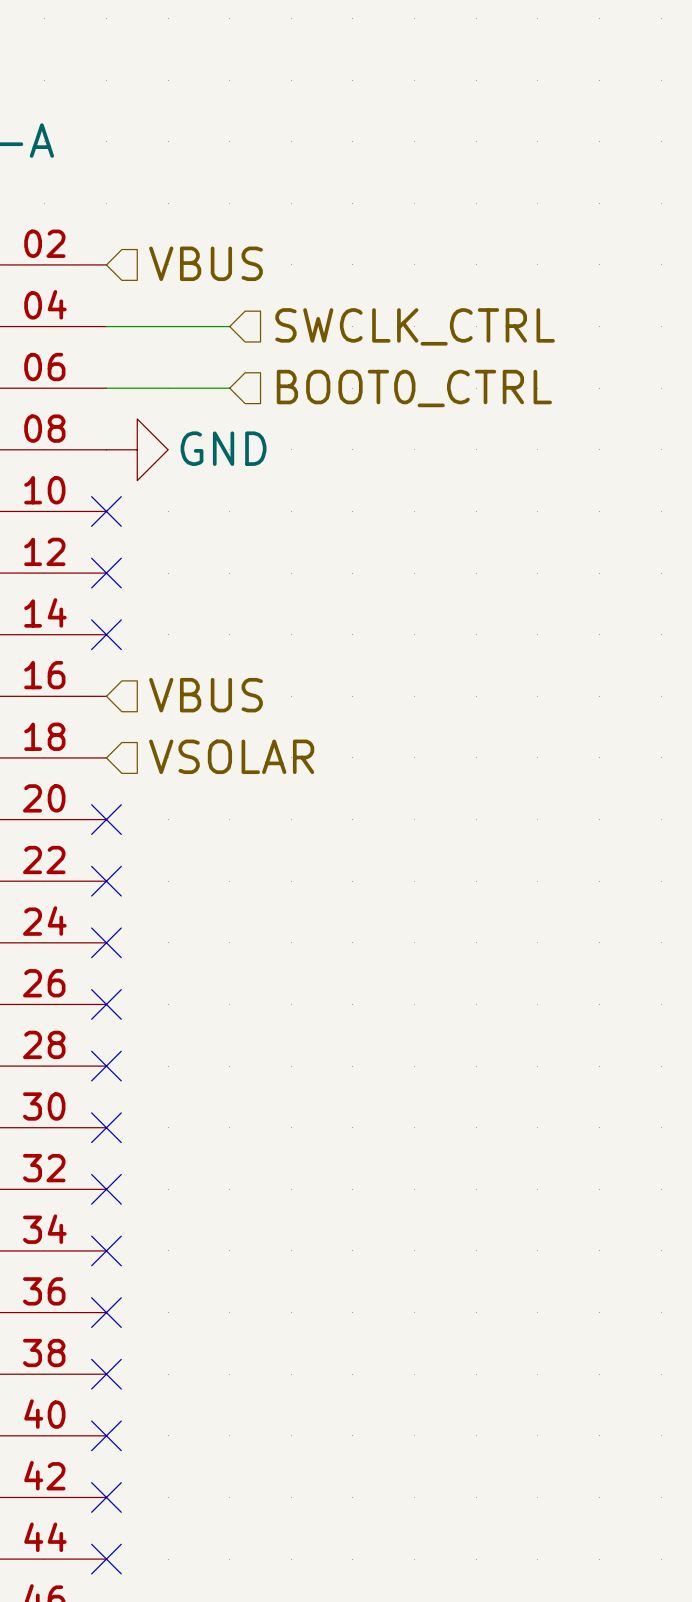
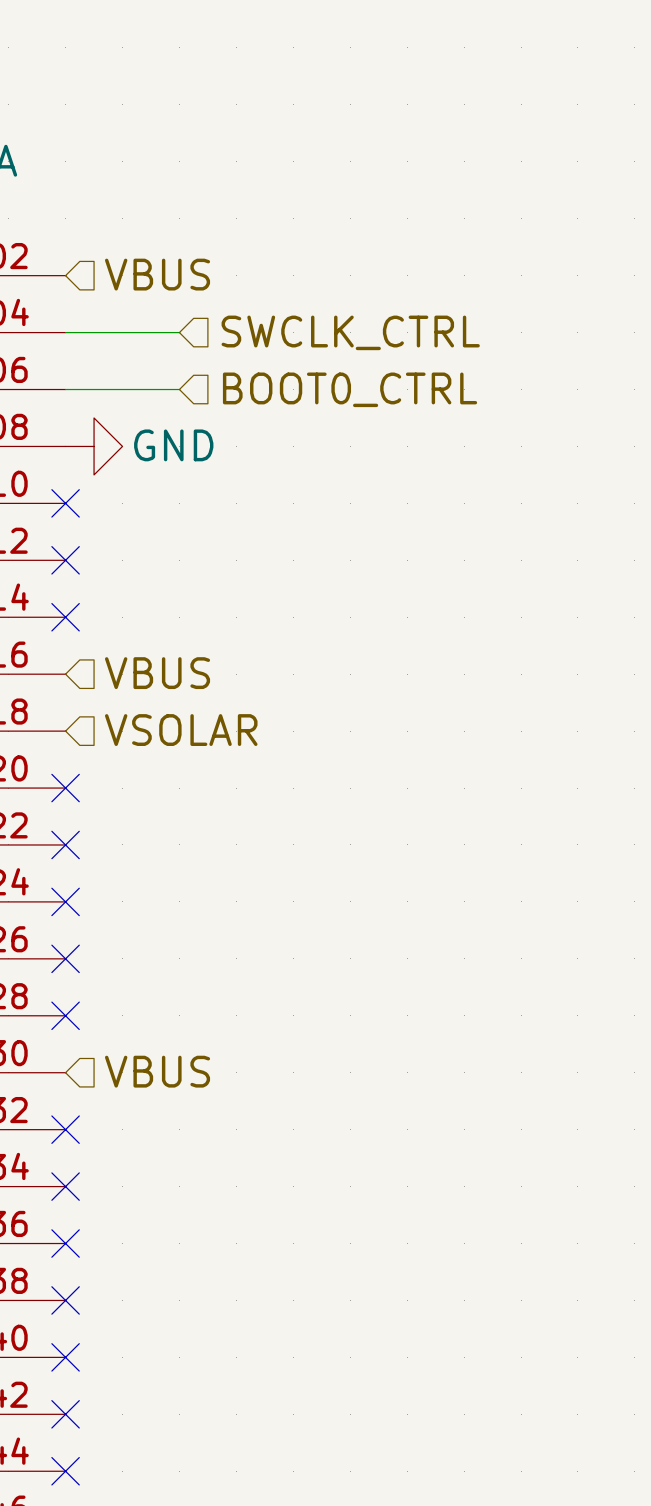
hierarchical label: none -> VBUS (157, 1071)
no-connect mark: (106, 1127) -> none

